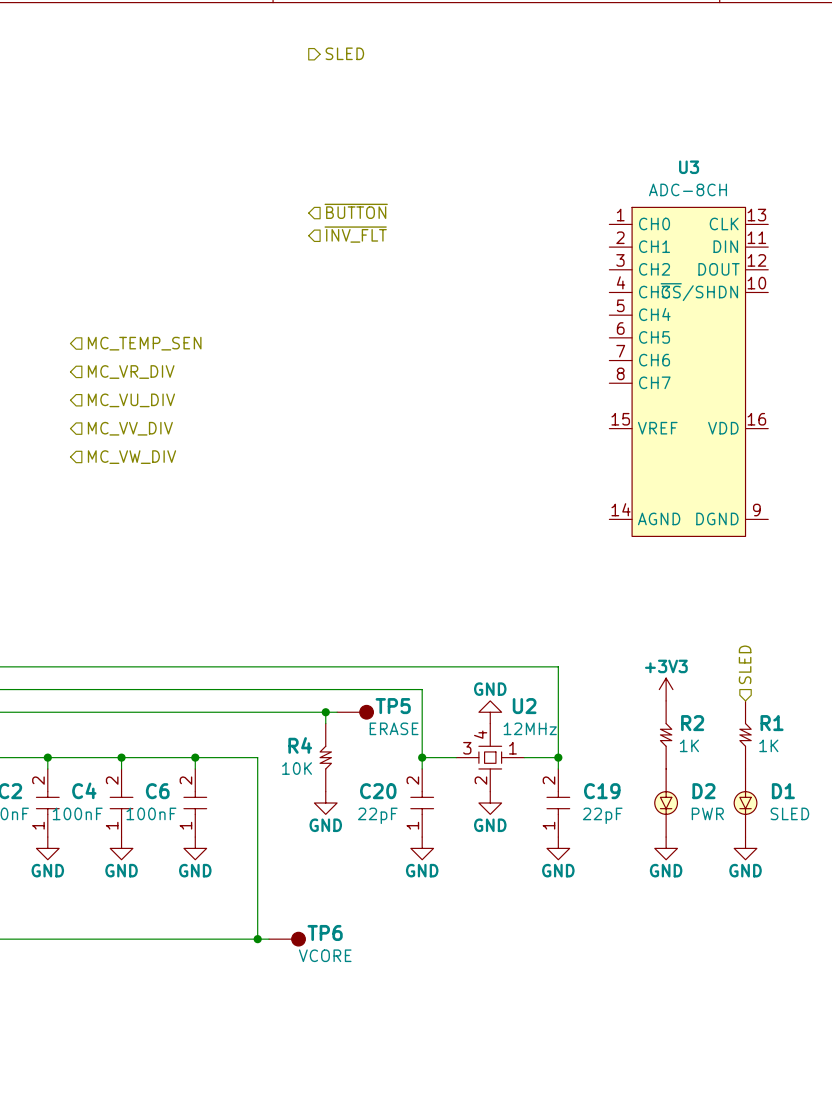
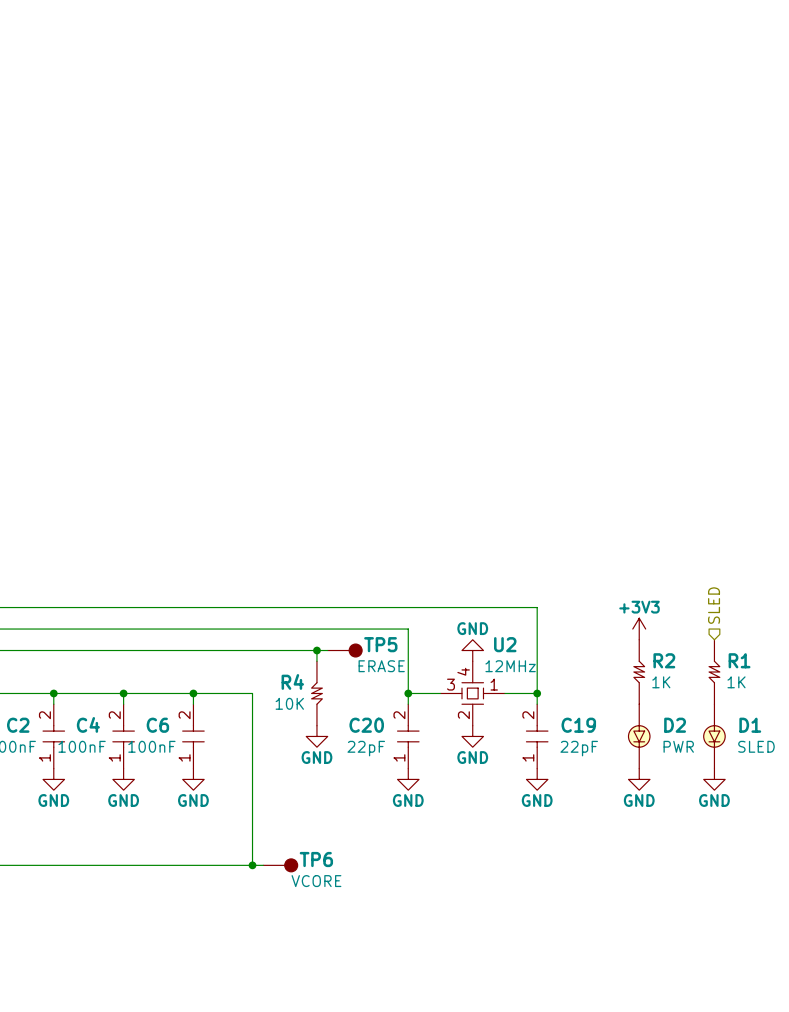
hierarchical label: SLED (344, 53) -> none
hierarchical label: ~{BUTTON} (356, 211) -> none
hierarchical label: ~{INV_FLT} (355, 234) -> none
hierarchical label: MC_TEMP_SEN (144, 343) -> none
U3: ADC-8CH (688, 371) -> none
hierarchical label: MC_VR_DIV (131, 372) -> none
hierarchical label: MC_VU_DIV (131, 400) -> none
hierarchical label: MC_VV_DIV (130, 428) -> none
hierarchical label: MC_VW_DIV (131, 457) -> none

